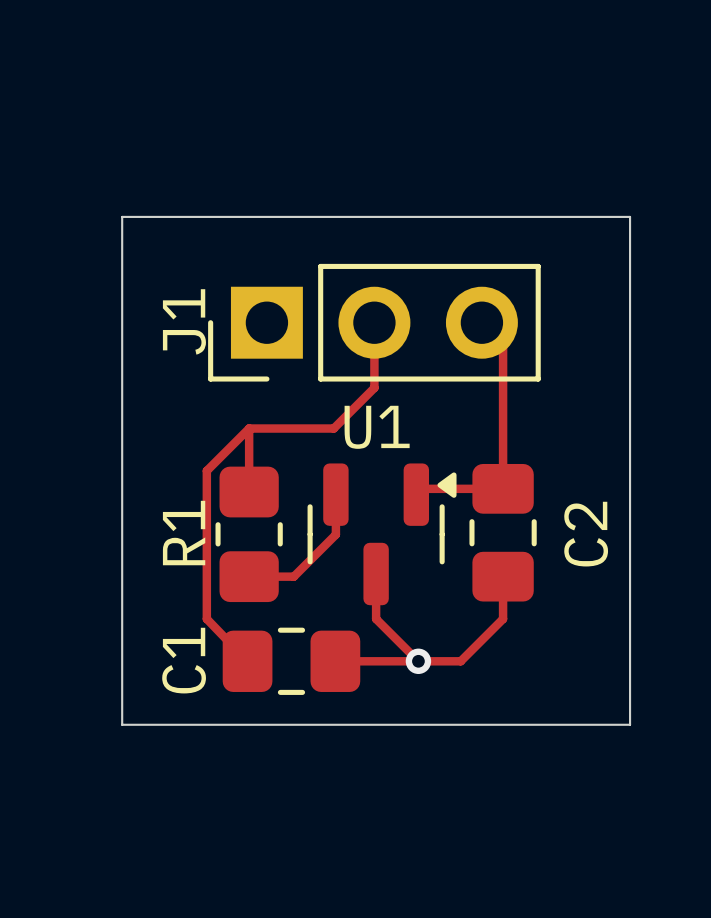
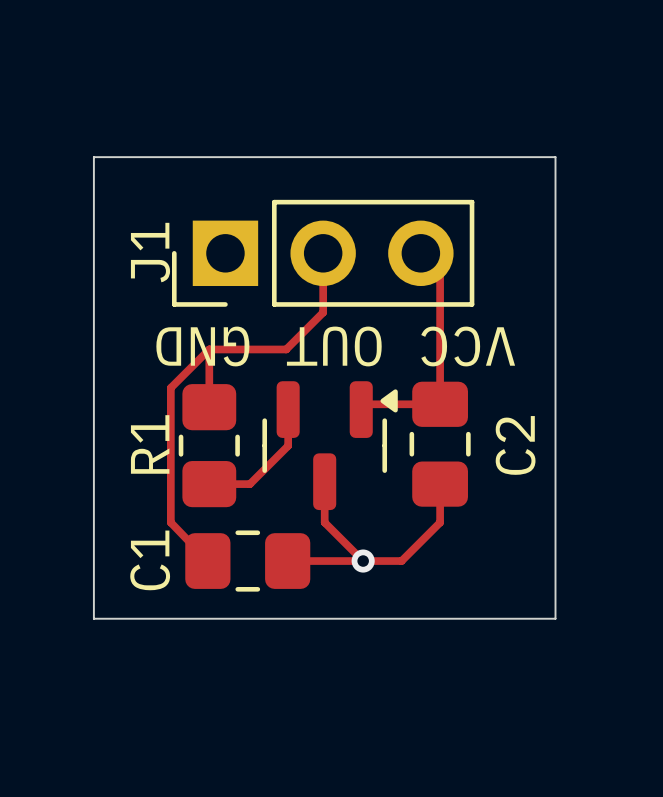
text: none -> VCC OUT GND (335, 346)
U1 name: U1 (377, 427) -> none

